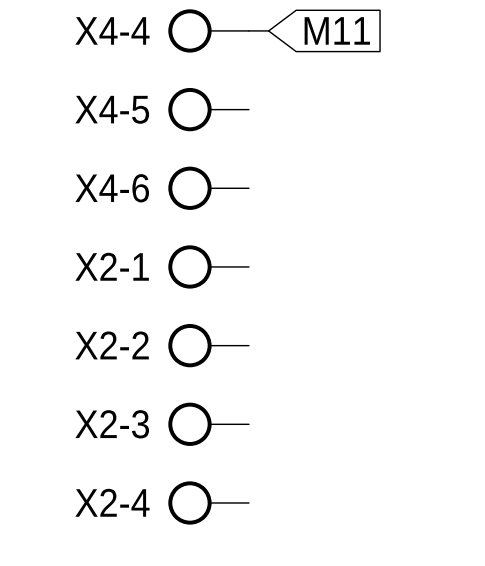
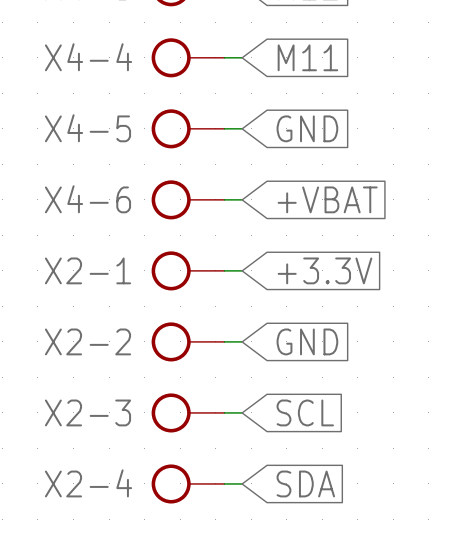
wire: none -> (224, 128) (242, 128)
global label: none -> GND (307, 128)
wire: none -> (224, 199) (242, 199)
global label: none -> +VBAT (327, 199)
wire: none -> (224, 270) (242, 270)
global label: none -> +3.3V (324, 270)
wire: none -> (224, 341) (242, 341)
global label: none -> GND (307, 341)
wire: none -> (224, 412) (242, 412)
global label: none -> SCL (305, 412)
wire: none -> (224, 483) (242, 483)
global label: none -> SDA (305, 483)

